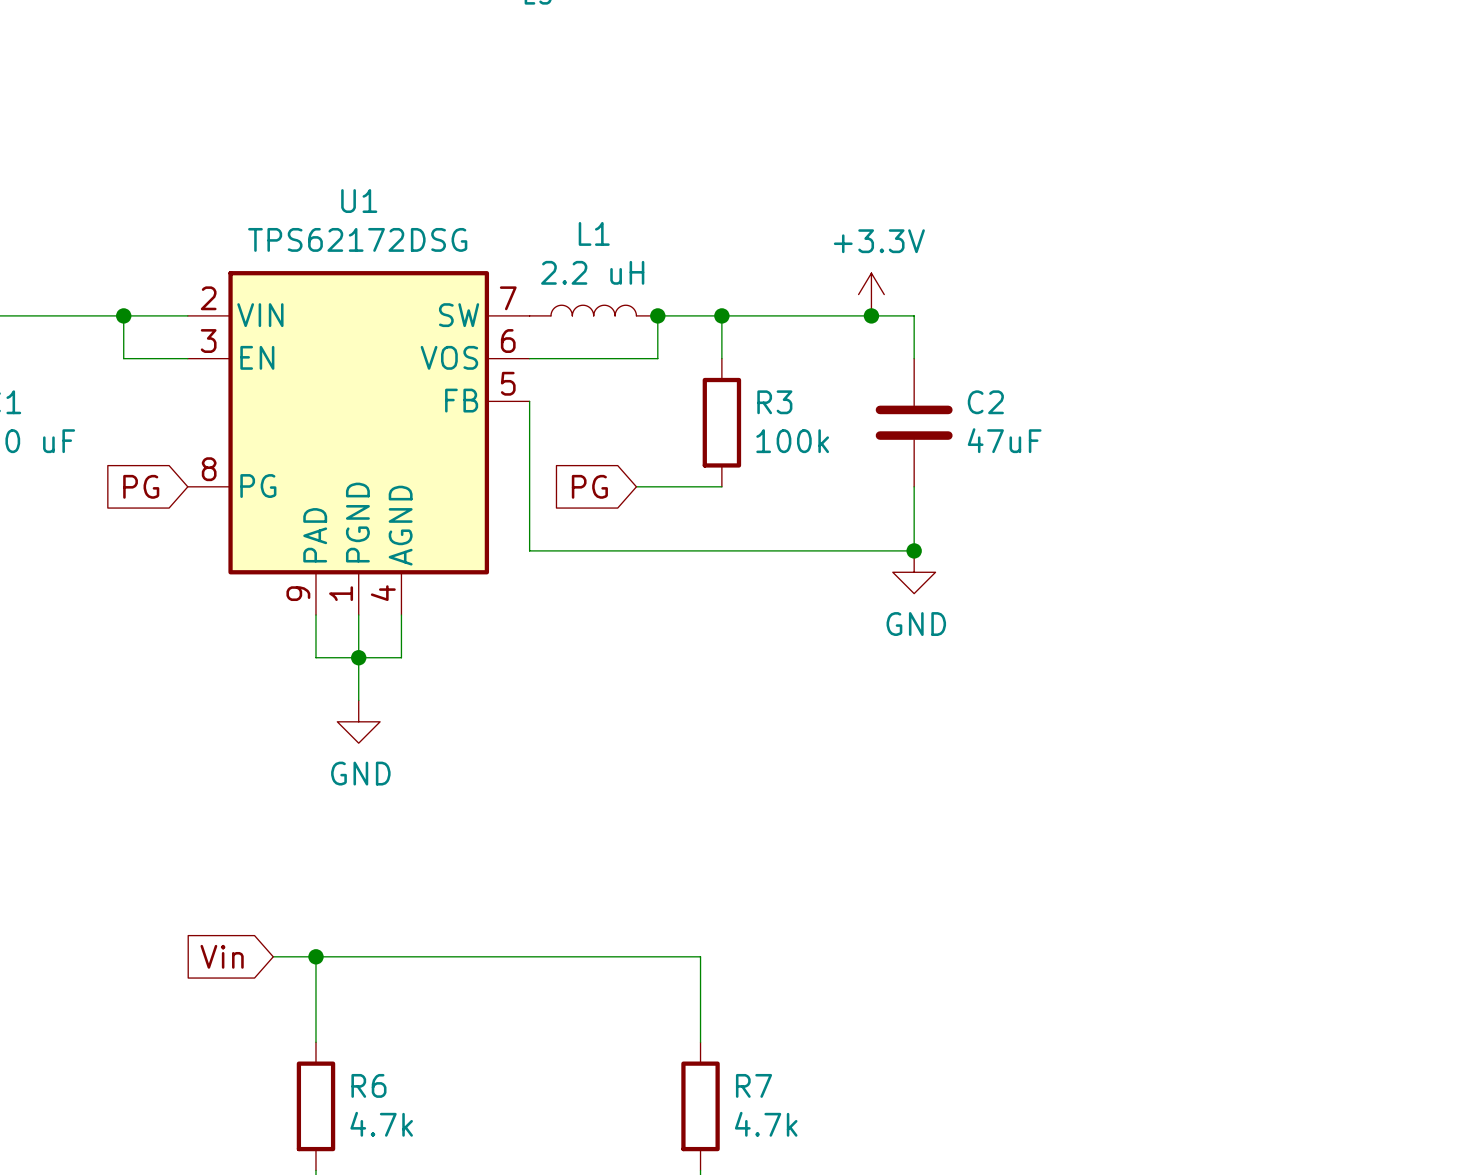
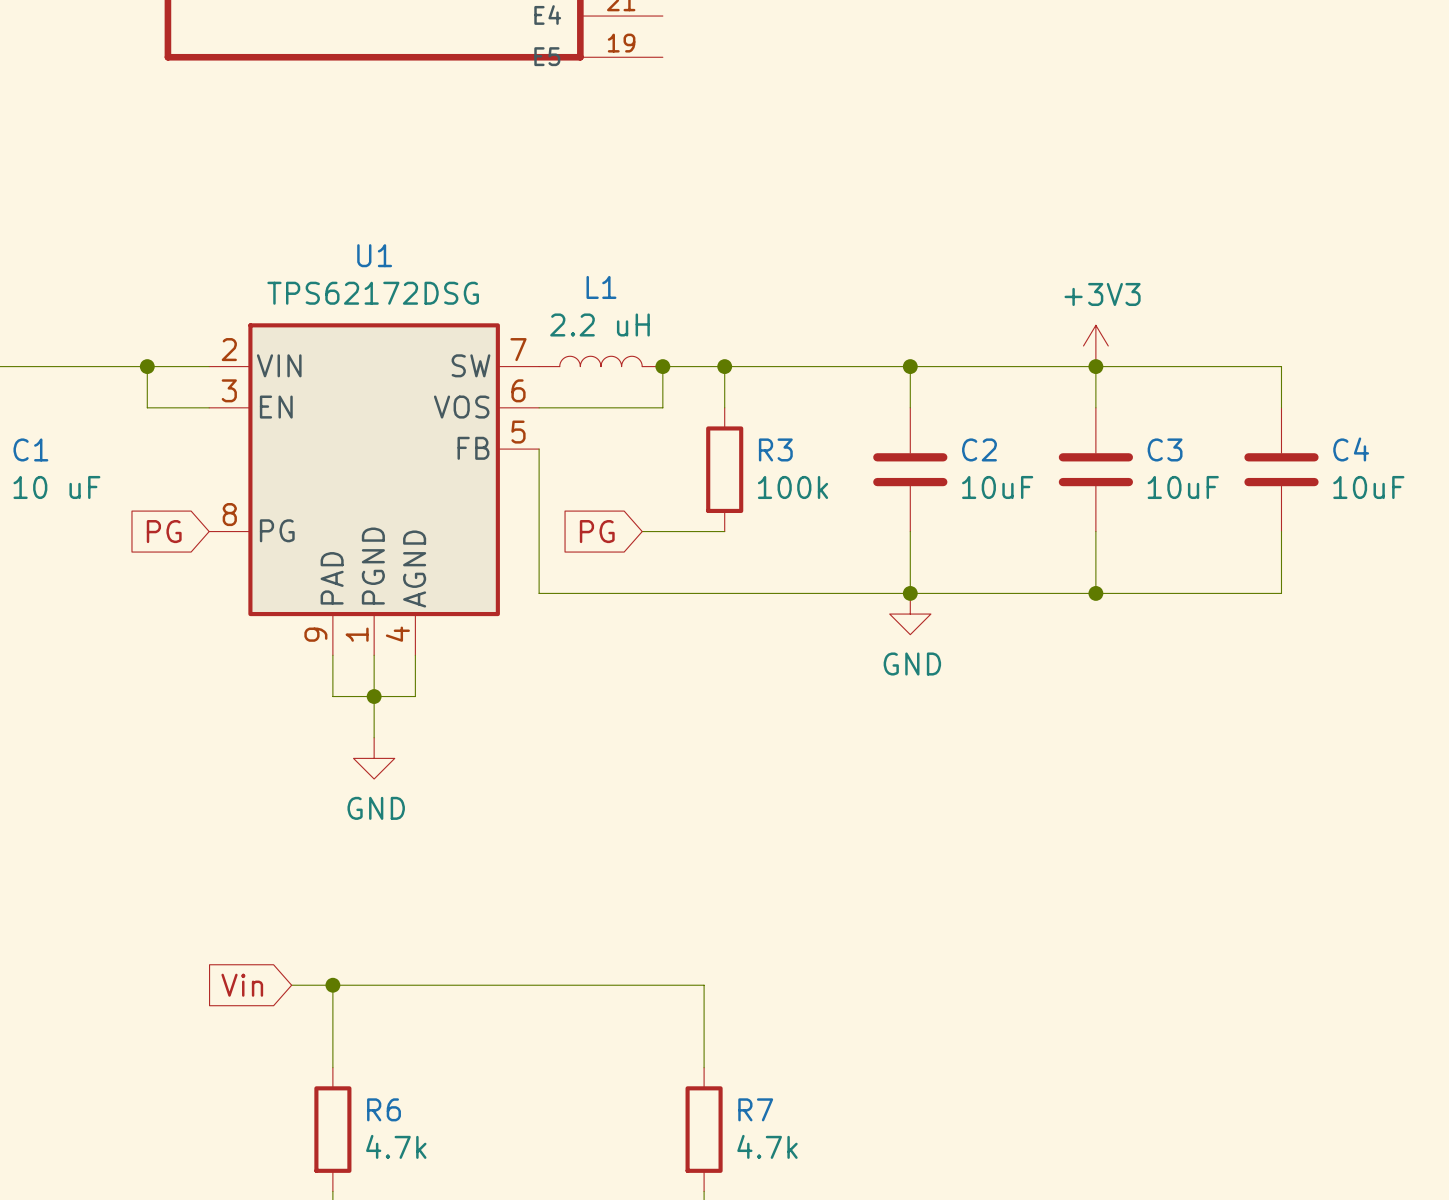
power symbol: +3.3V (871, 294) -> none
power symbol: none -> +3V3 (1095, 345)
junction position: (871, 315) -> (910, 366)
wire: none -> (910, 366) (1281, 366) (1281, 407)
wire: none -> (1095, 366) (1095, 407)
junction: none -> (1095, 366)
C3: none -> 10uF (1095, 469)
C4: none -> 10uF (1281, 469)
C2 value: 47uF (1004, 440) -> 10uF (997, 487)
wire: none -> (1095, 531) (1095, 593)
wire: none -> (1281, 531) (1281, 593) (910, 593)
junction: none -> (1095, 593)

